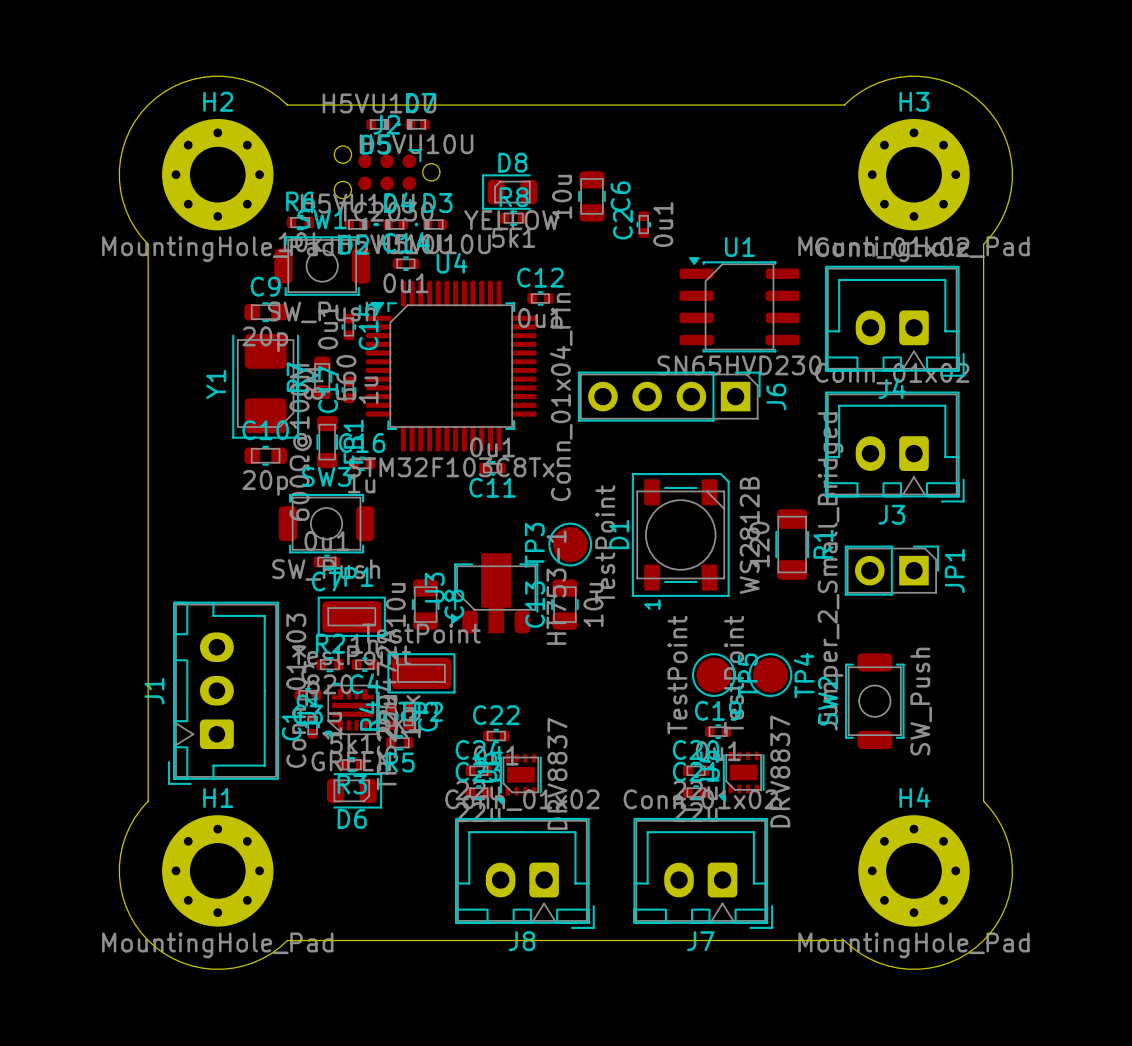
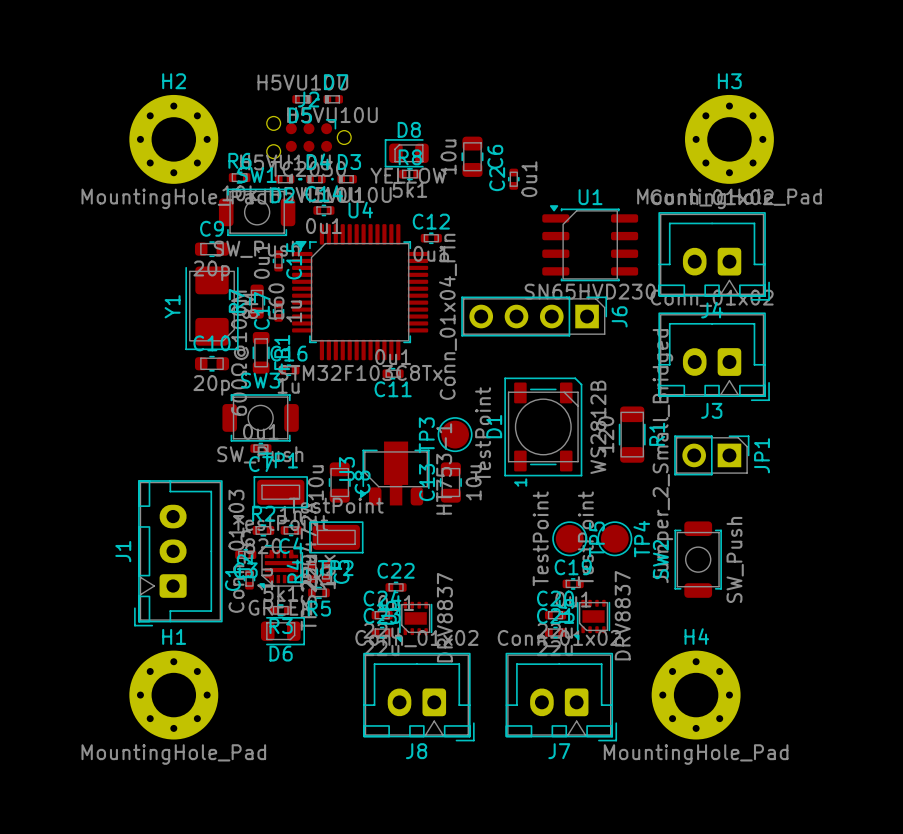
board edge: (287, 105) (844, 105) (860, 92) (878, 82) (898, 77) (919, 76) (939, 79) (958, 86) (975, 98) (990, 112) (1001, 129) (1009, 149) (1012, 179) (1009, 200) (1001, 219) (983, 244) (983, 801) (996, 817) (1005, 835) (1011, 855) (1012, 876) (1009, 896) (1001, 915) (990, 932) (975, 947) (949, 962) (929, 968) (908, 969) (878, 962) (860, 953) (844, 940) (287, 940) (271, 953) (253, 962) (233, 968) (212, 969) (192, 966) (173, 958) (155, 947) (141, 932) (125, 906) (120, 886) (119, 865) (122, 845) (130, 826) (148, 801) (148, 244) (135, 228) (125, 209) (119, 179) (120, 159) (125, 139) (141, 112) (164, 92) (182, 82) (212, 76) (243, 79) (271, 92) (287, 105) -> none
H4 position: (913, 870) -> (696, 695)

